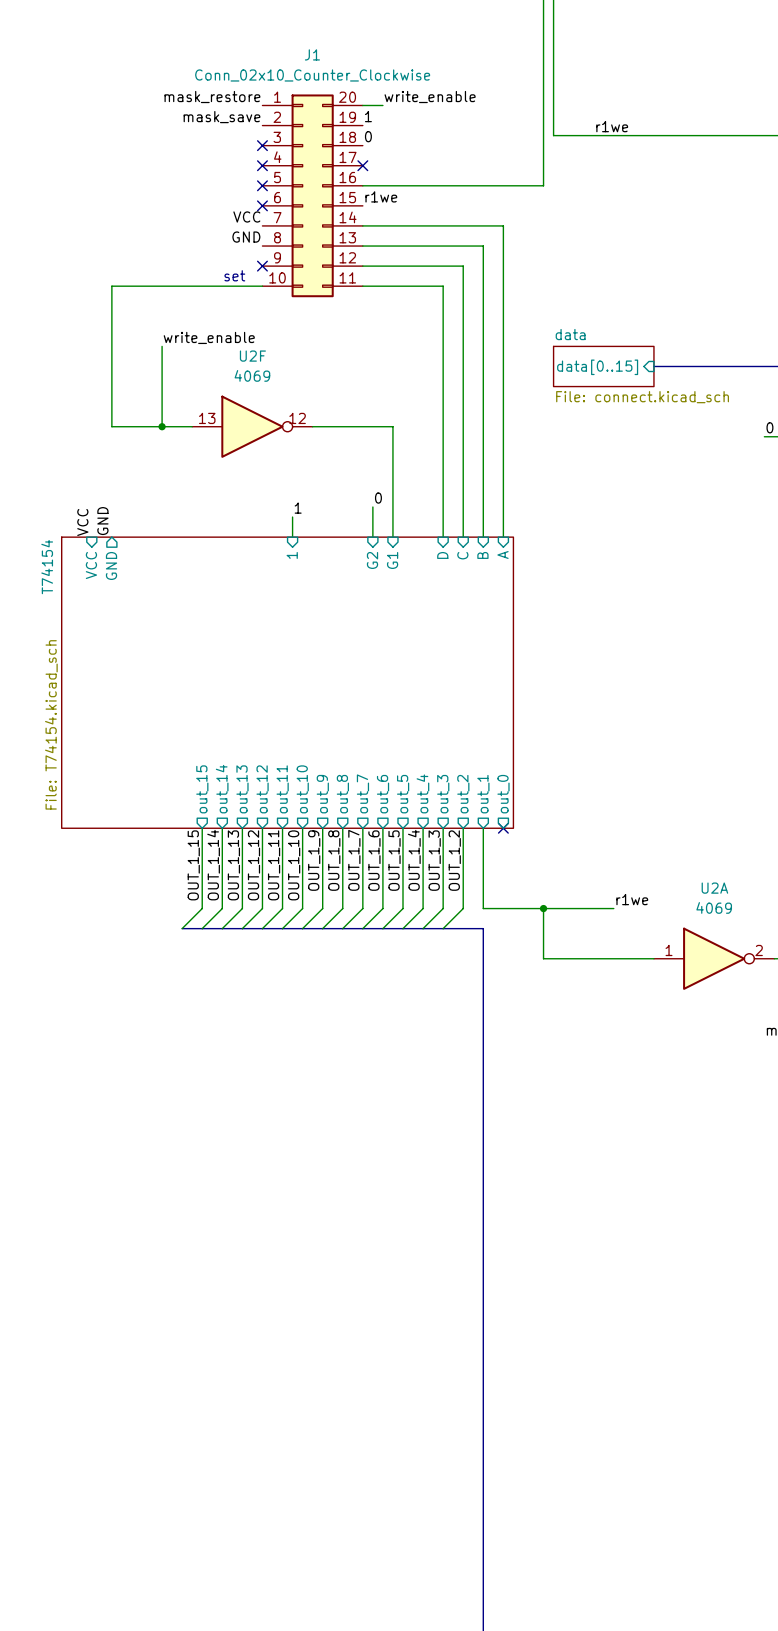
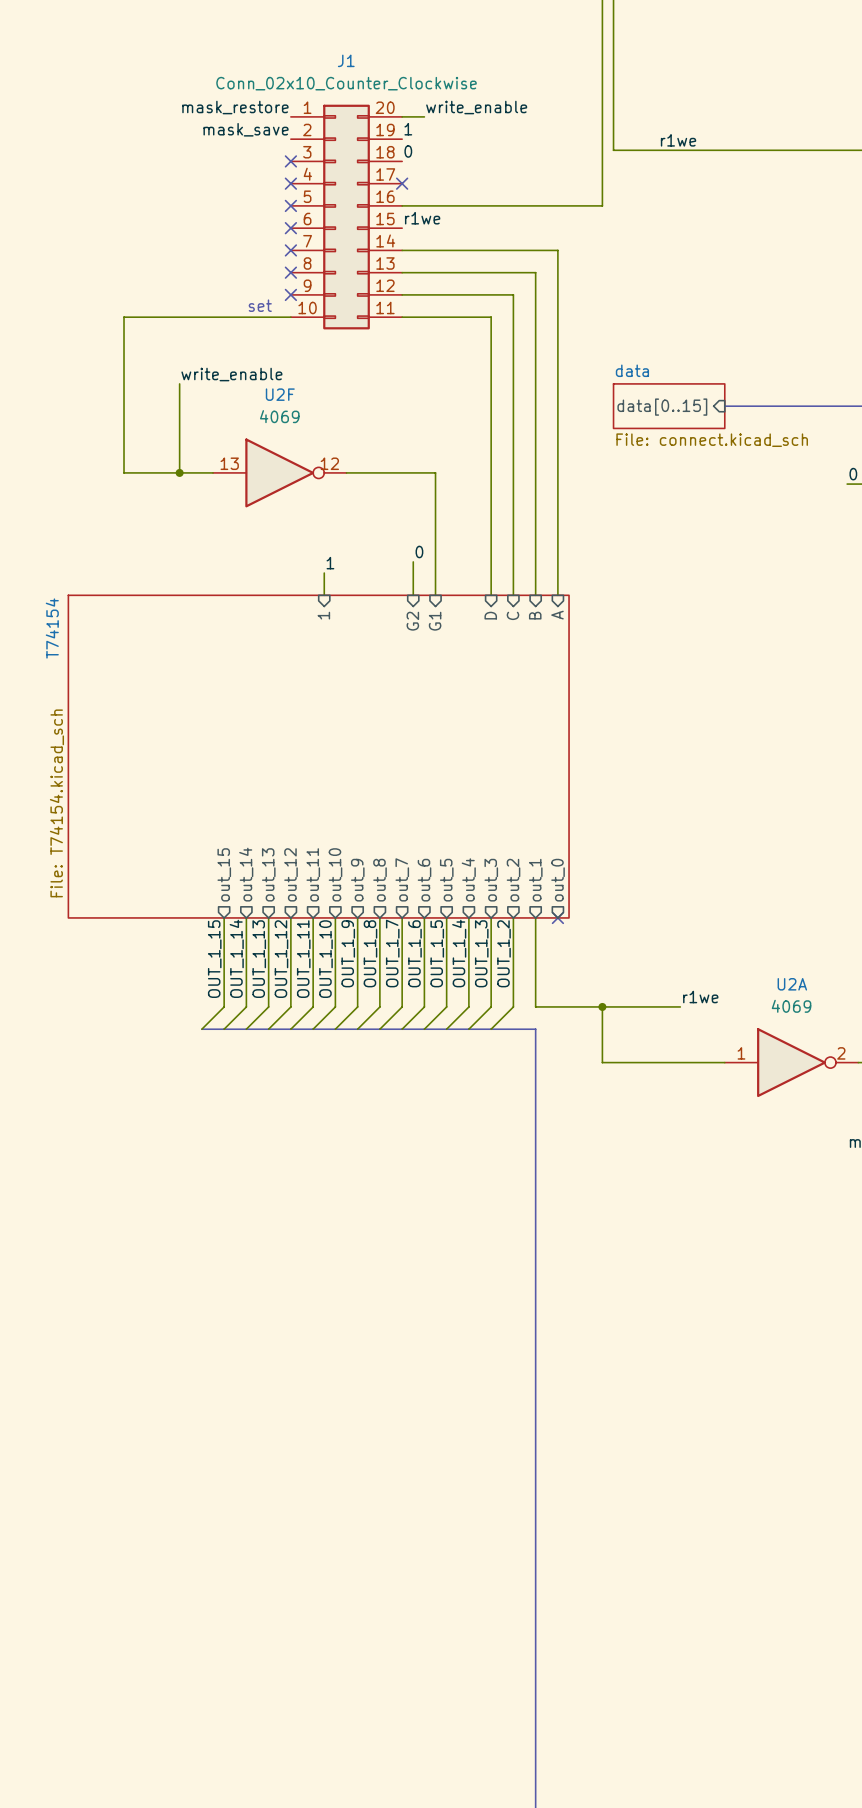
label: VCC (246, 216) -> none
no-connect mark: none -> (290, 250)
label: GND (246, 237) -> none
no-connect mark: none -> (290, 272)
label: GND (102, 521) -> none
label: VCC (82, 522) -> none
sheet pin: VCC (91, 565) -> none
sheet pin: GND (111, 565) -> none

